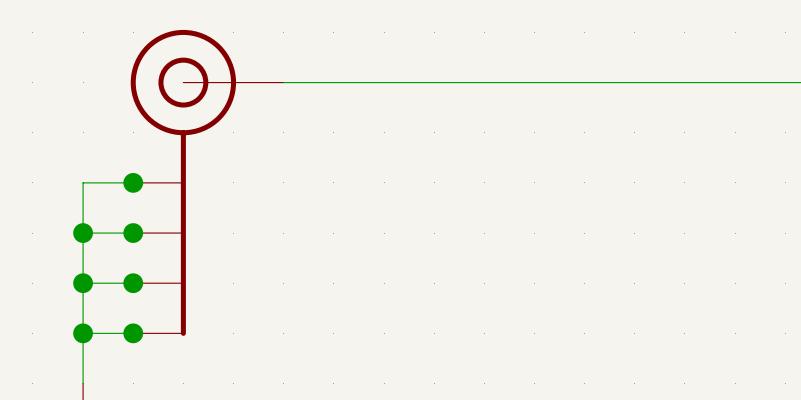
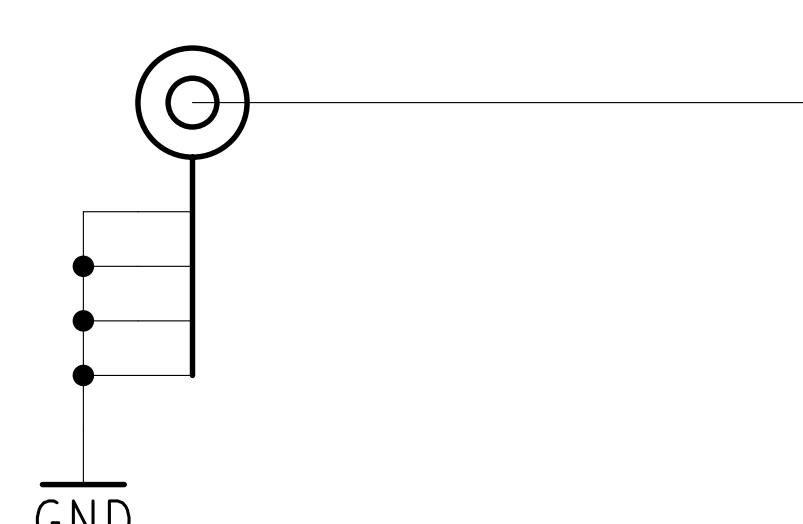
junction: (133, 182) -> none
junction: (133, 233) -> none
junction: (133, 283) -> none
junction: (133, 333) -> none

